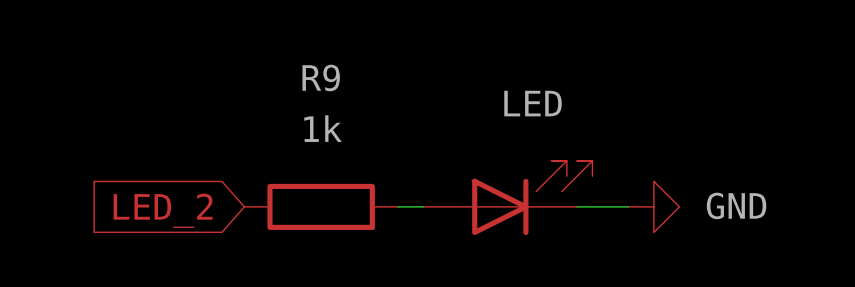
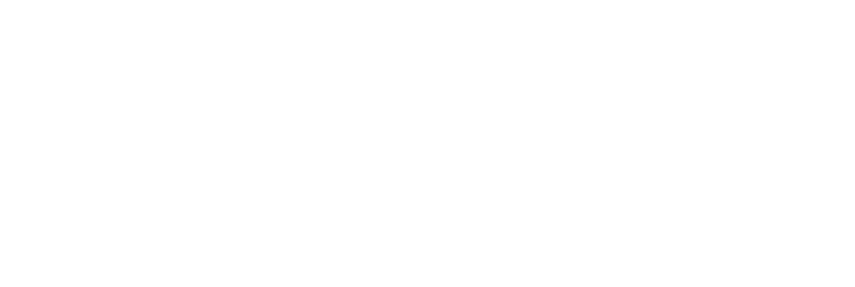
part: LED (507, 197) -> none
R9: 1k (321, 206) -> none
wire: (397, 206) (423, 206) -> none
wire: (577, 206) (628, 206) -> none
power symbol: GND (653, 206) -> none
global label: LED_2 (163, 210) -> none

